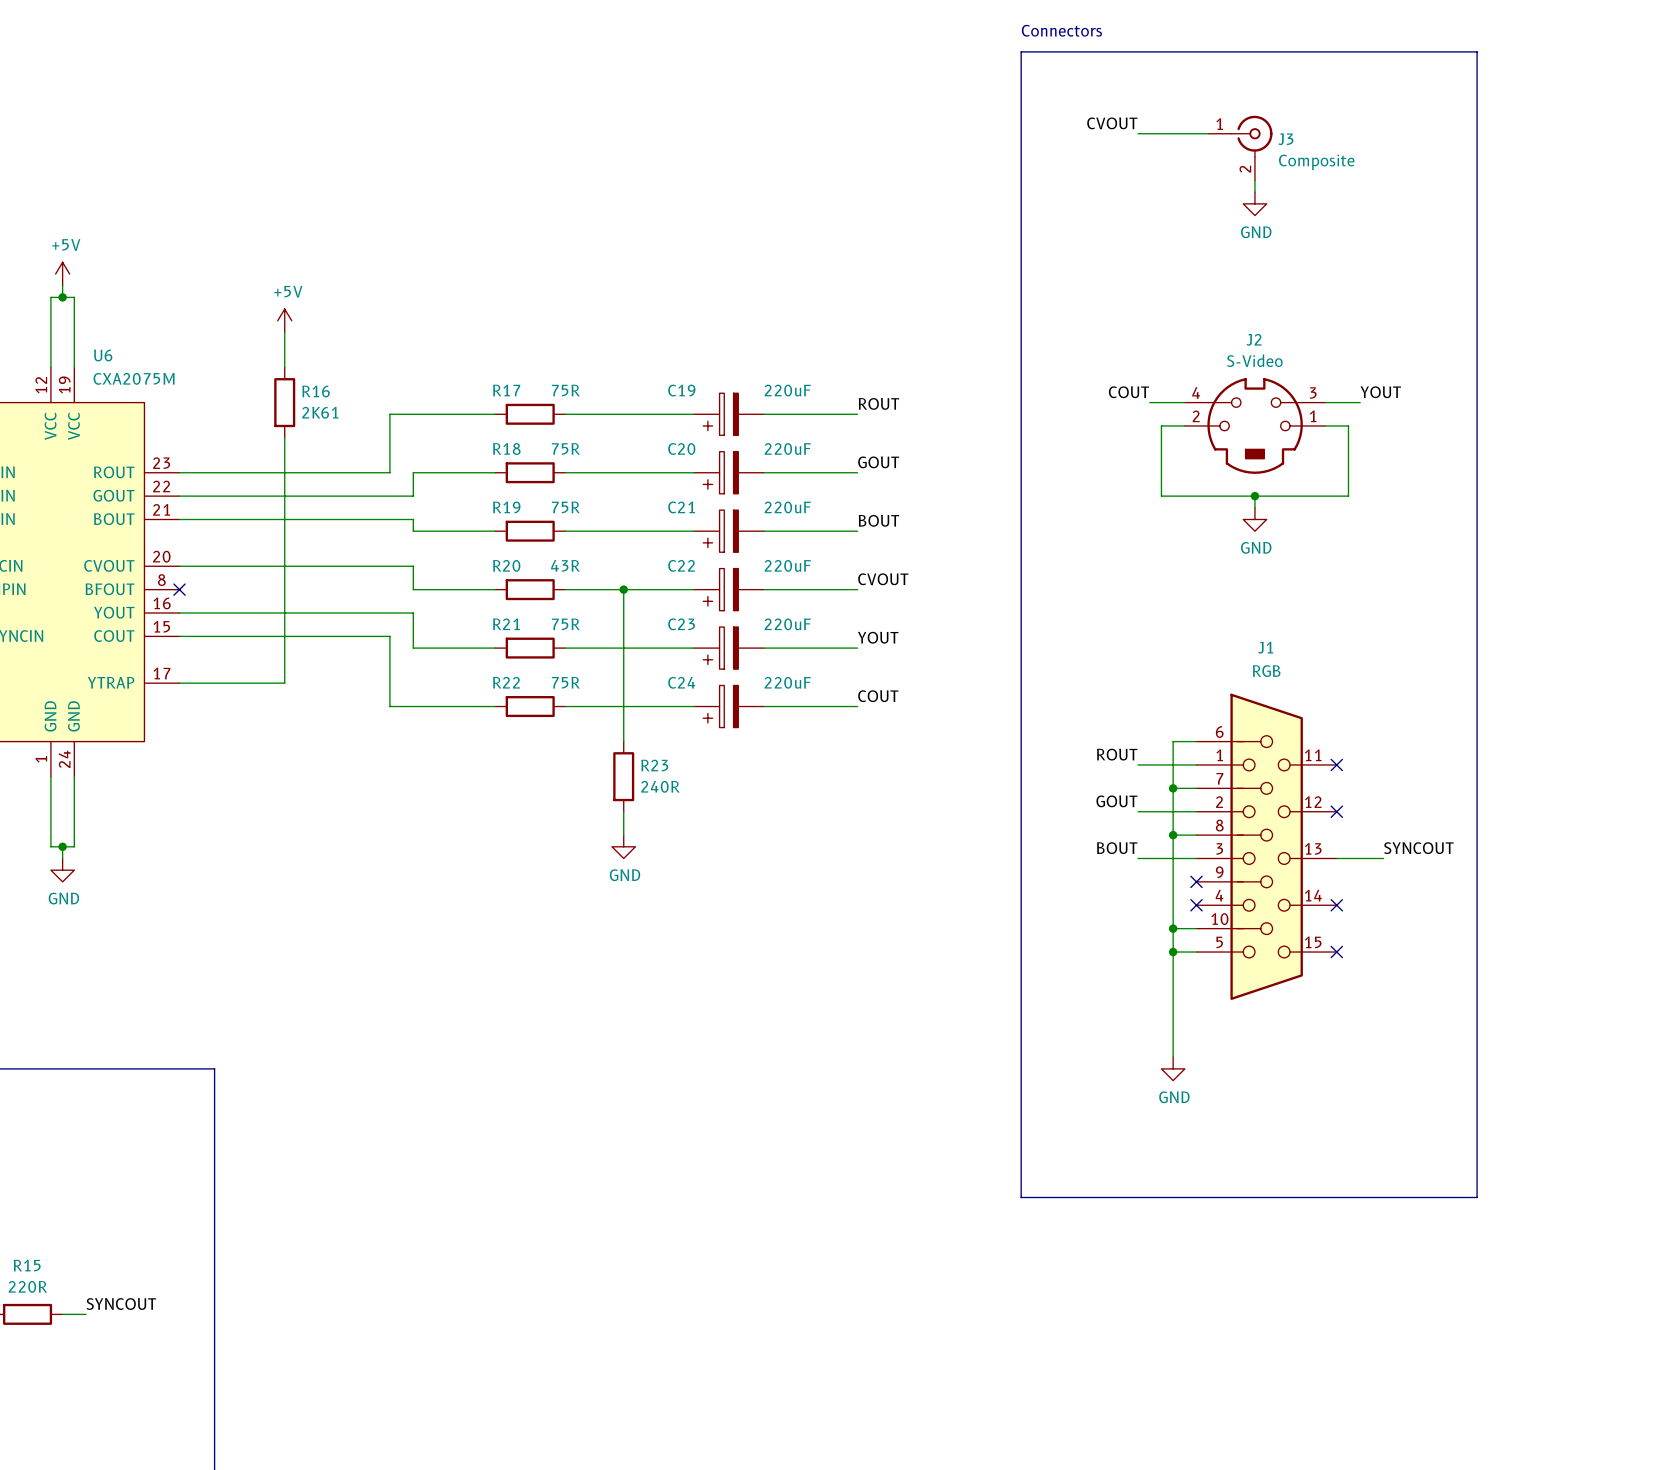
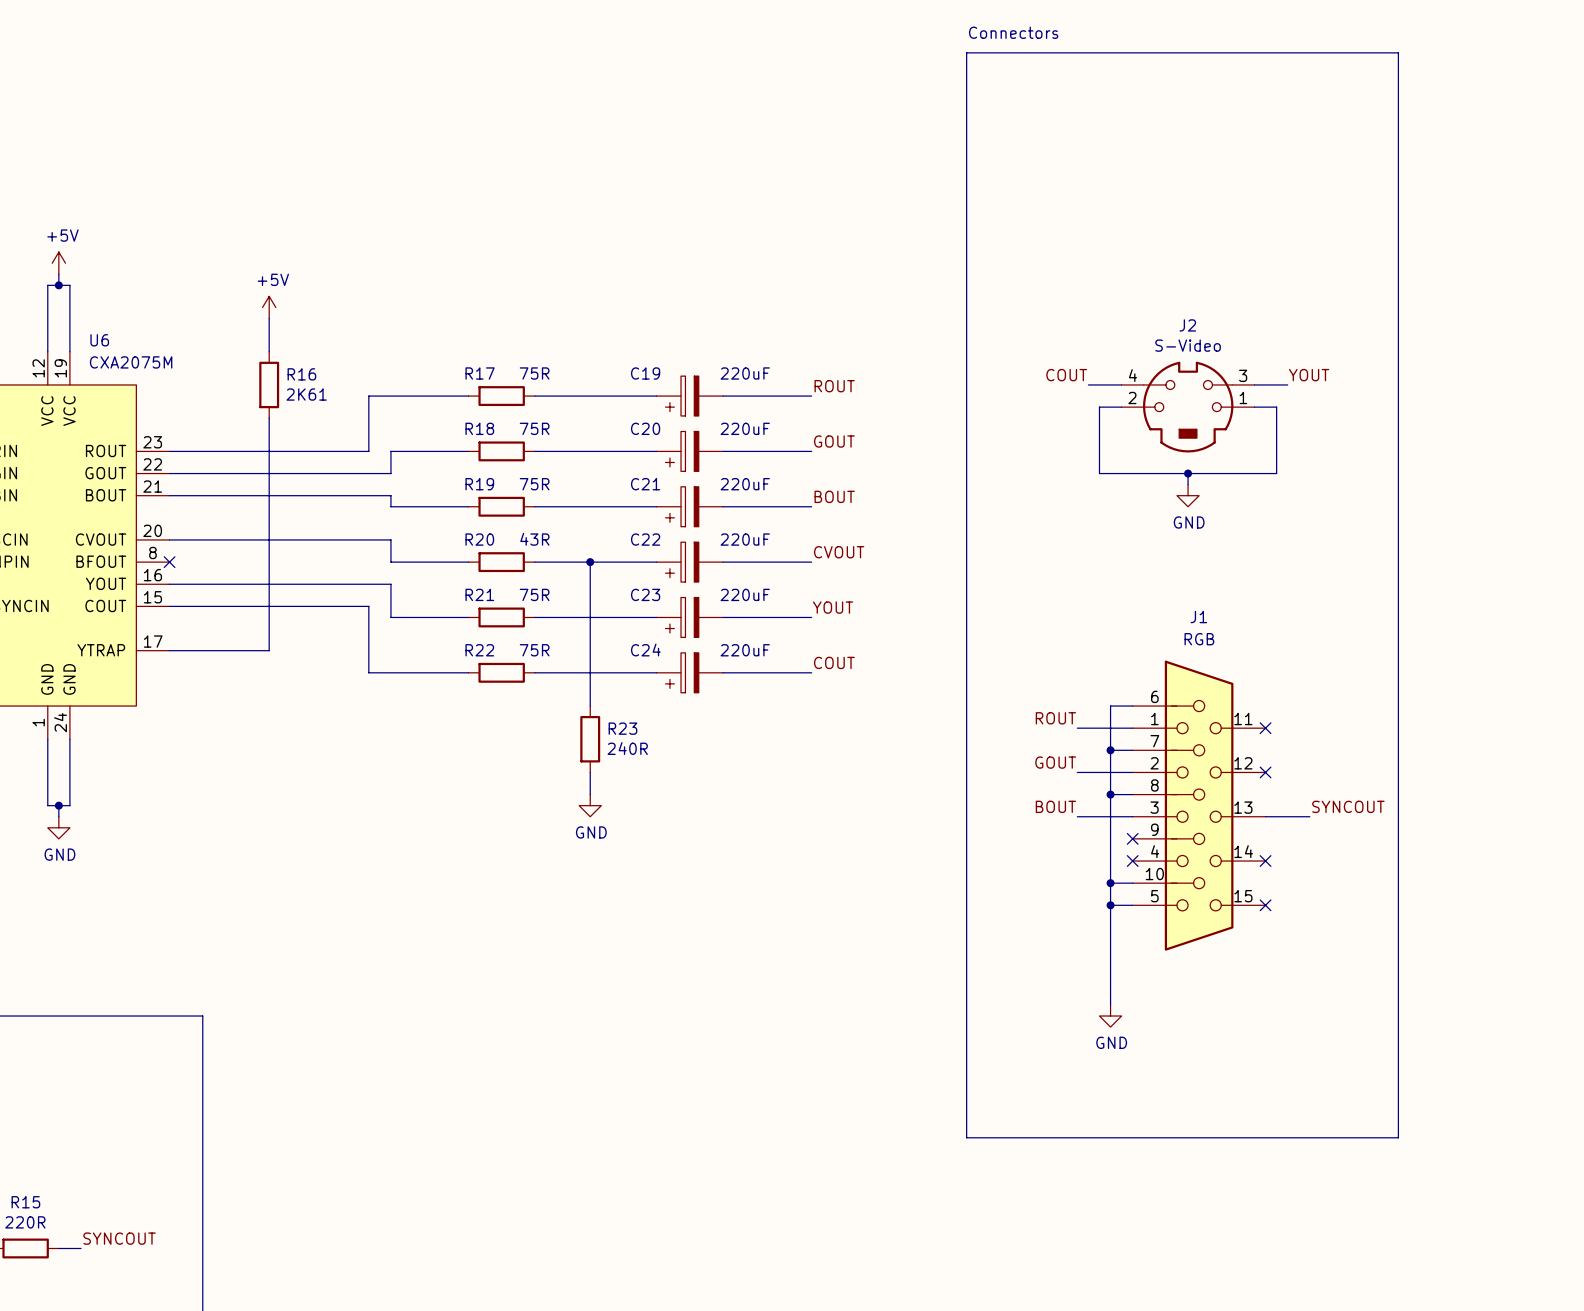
label: CVOUT (1112, 123) -> none
wire: (1138, 133) (1208, 133) -> none
J3: Composite (1240, 148) -> none
wire: (1254, 180) (1254, 192) -> none
power symbol: GND (1254, 203) -> none

